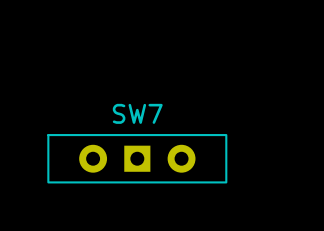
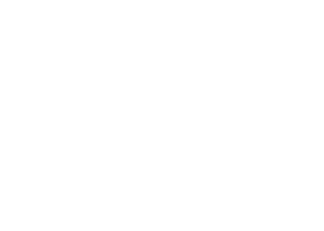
SW7: (137, 158) -> none

